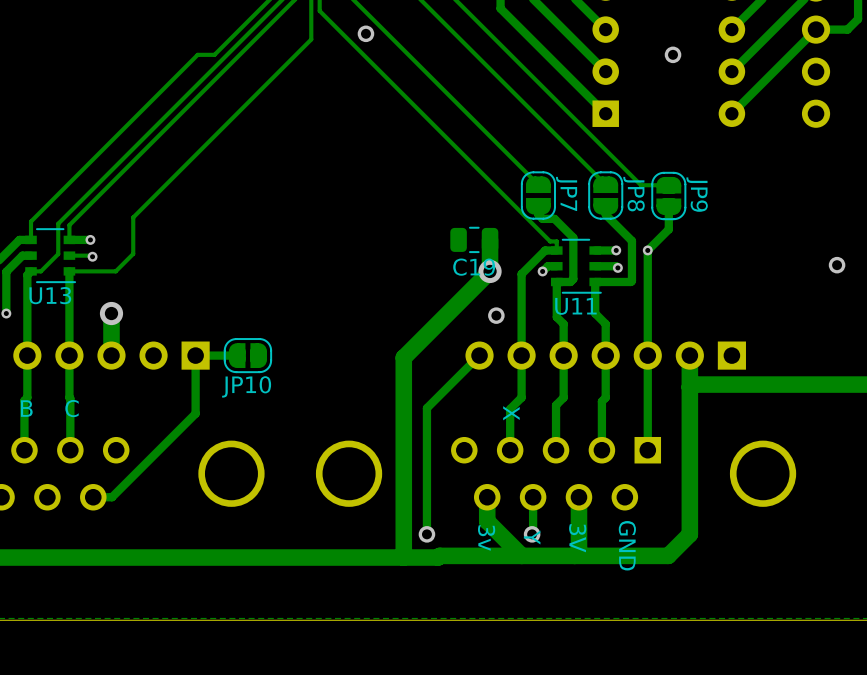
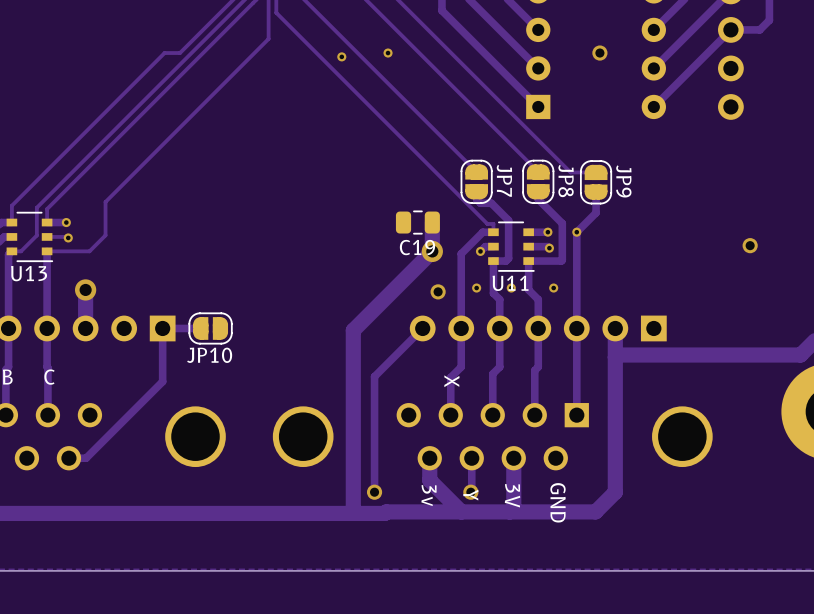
via: (365, 33) -> none
via: none -> (388, 53)
via: none -> (341, 56)
via: none -> (476, 288)
via: none -> (511, 288)
via: none -> (553, 288)

